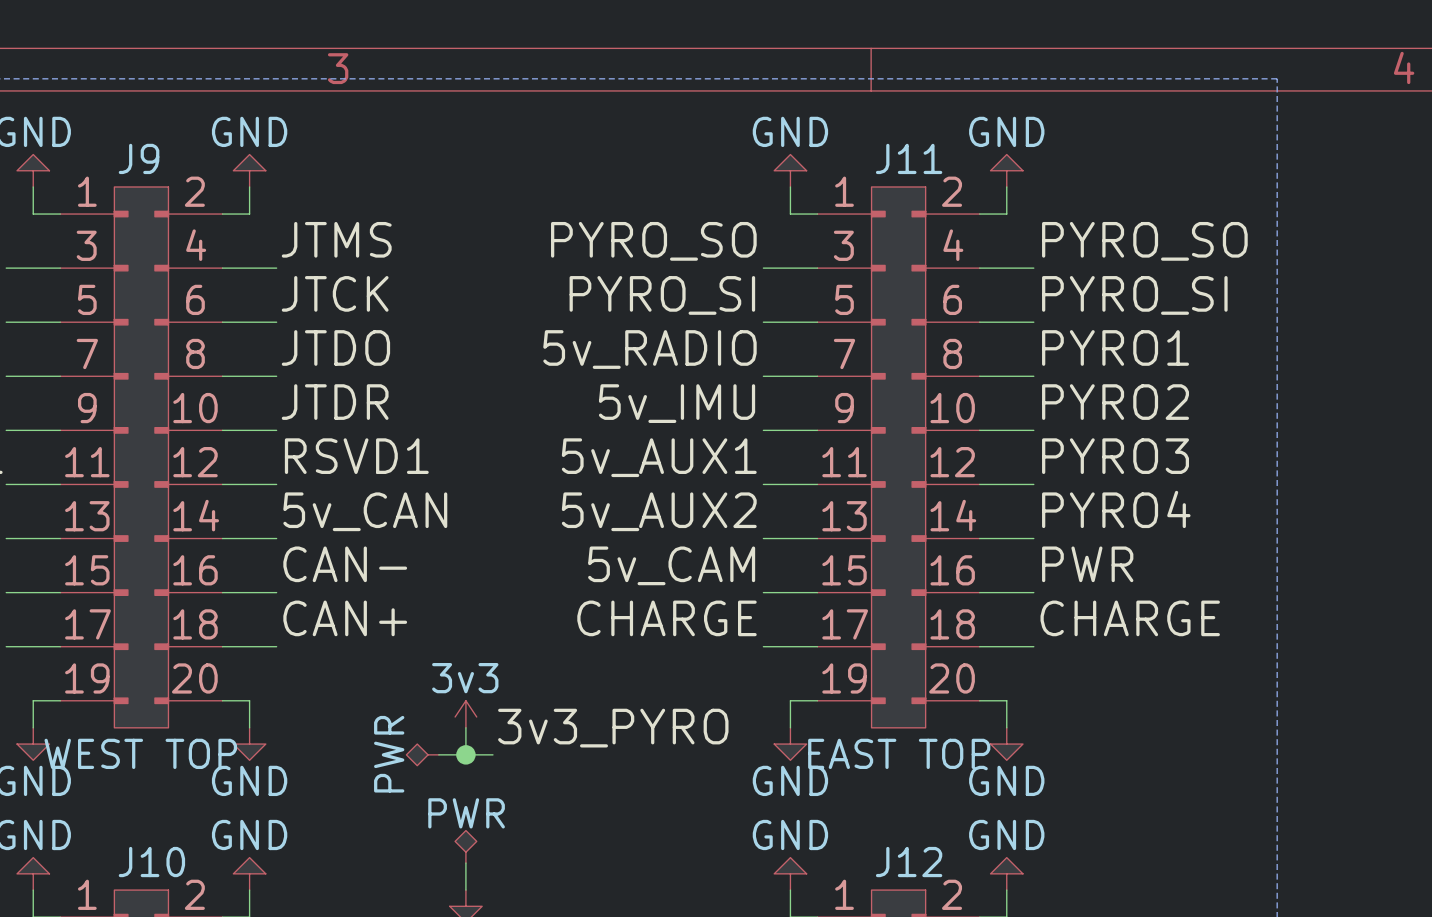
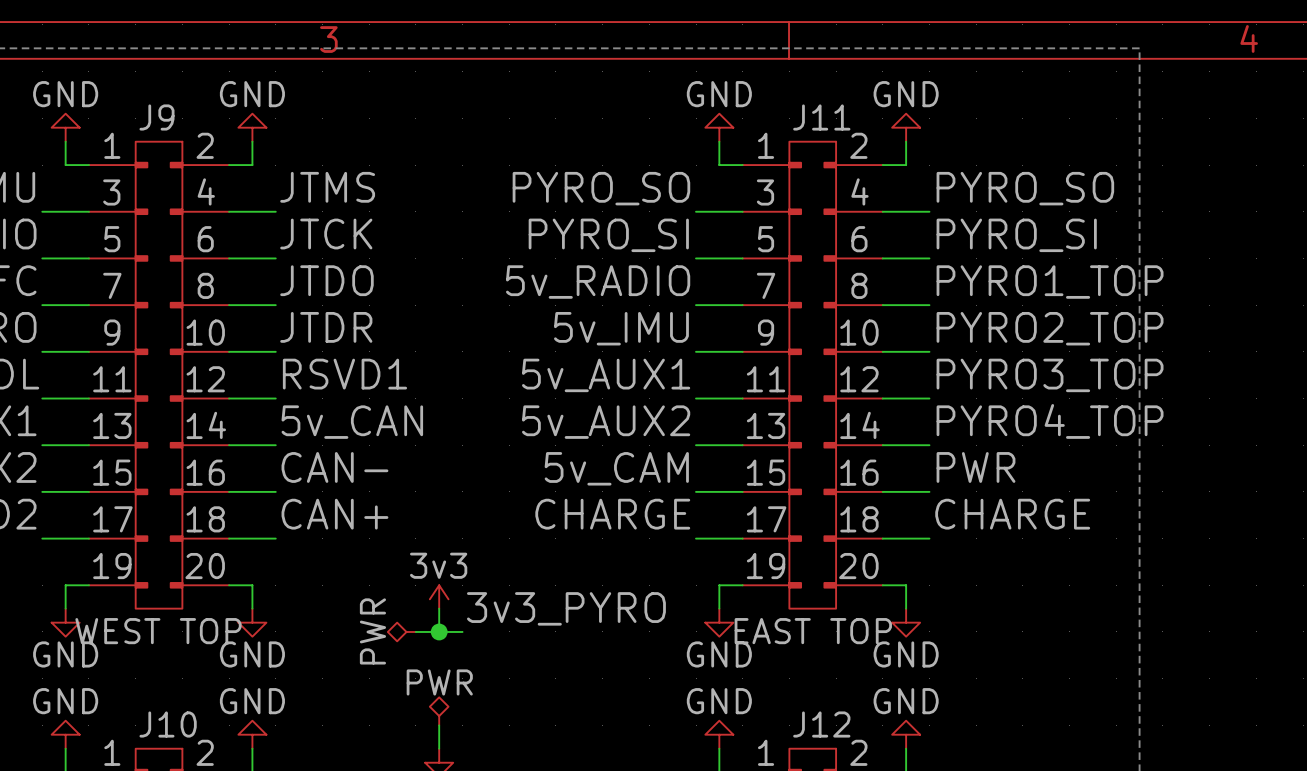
label: PYRO1 (1115, 347) -> PYRO1_TOP (1050, 282)
label: PYRO2 (1115, 402) -> PYRO2_TOP (1050, 328)
label: PYRO3 (1115, 456) -> PYRO3_TOP (1050, 375)
label: PYRO4 (1116, 509) -> PYRO4_TOP (1050, 421)

